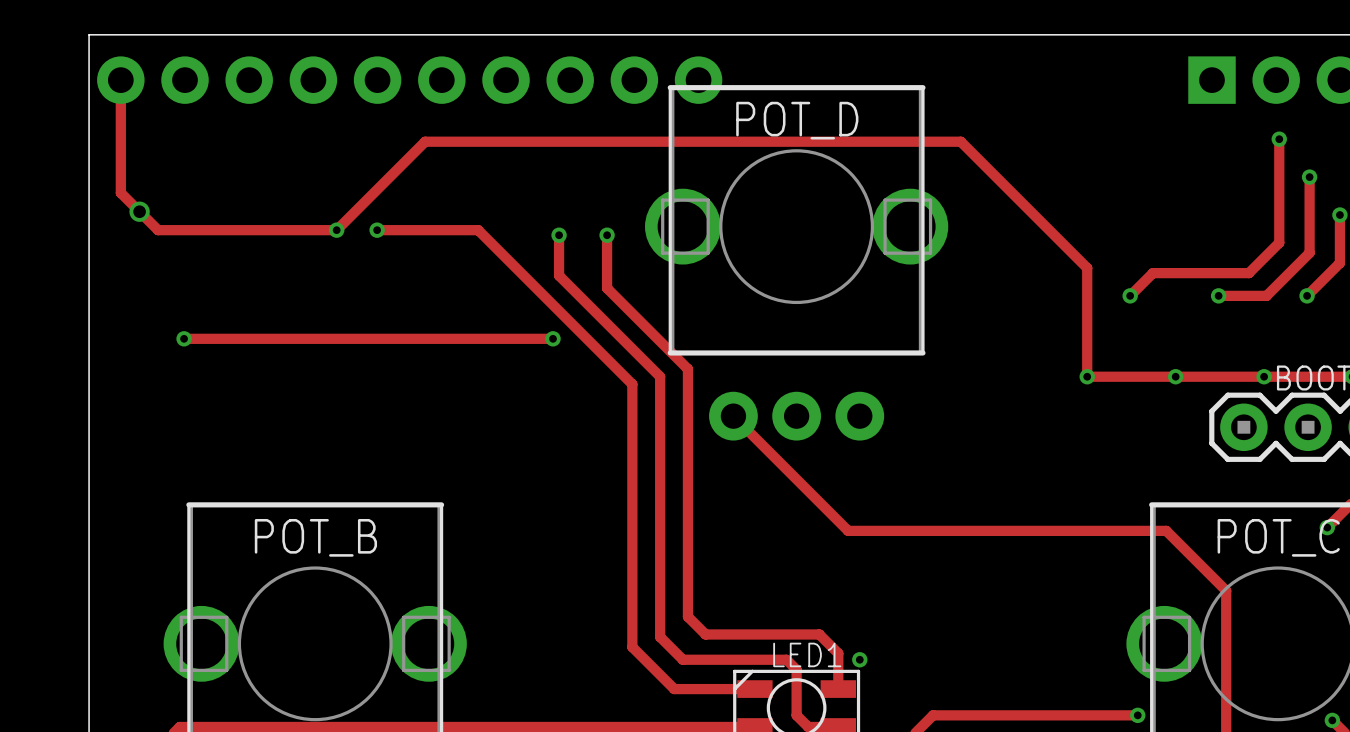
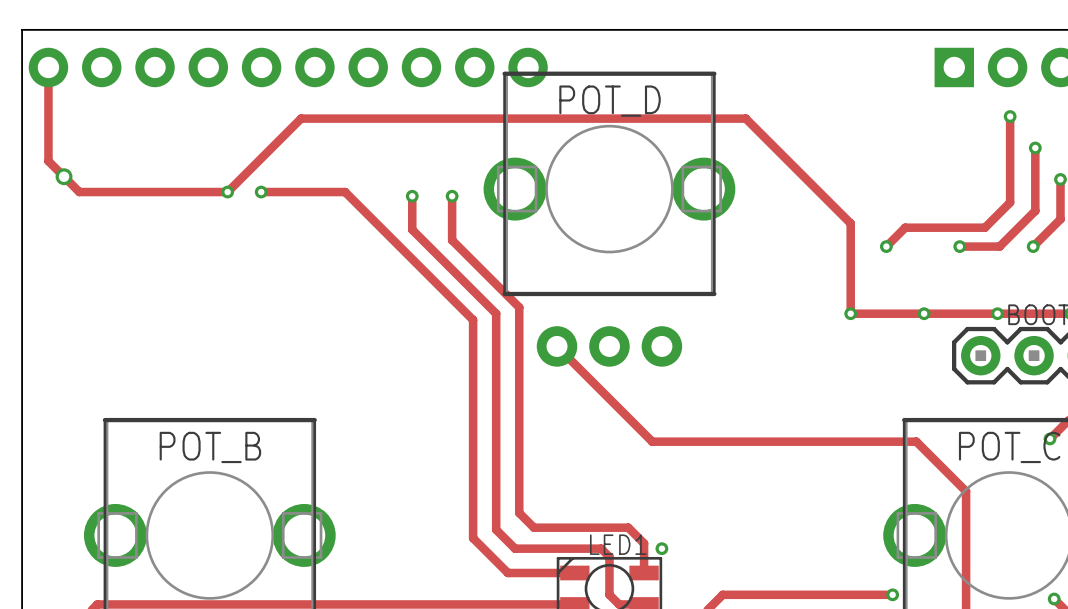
track: (184, 338) (553, 338) -> none
via: (184, 338) -> none
via: (553, 338) -> none

